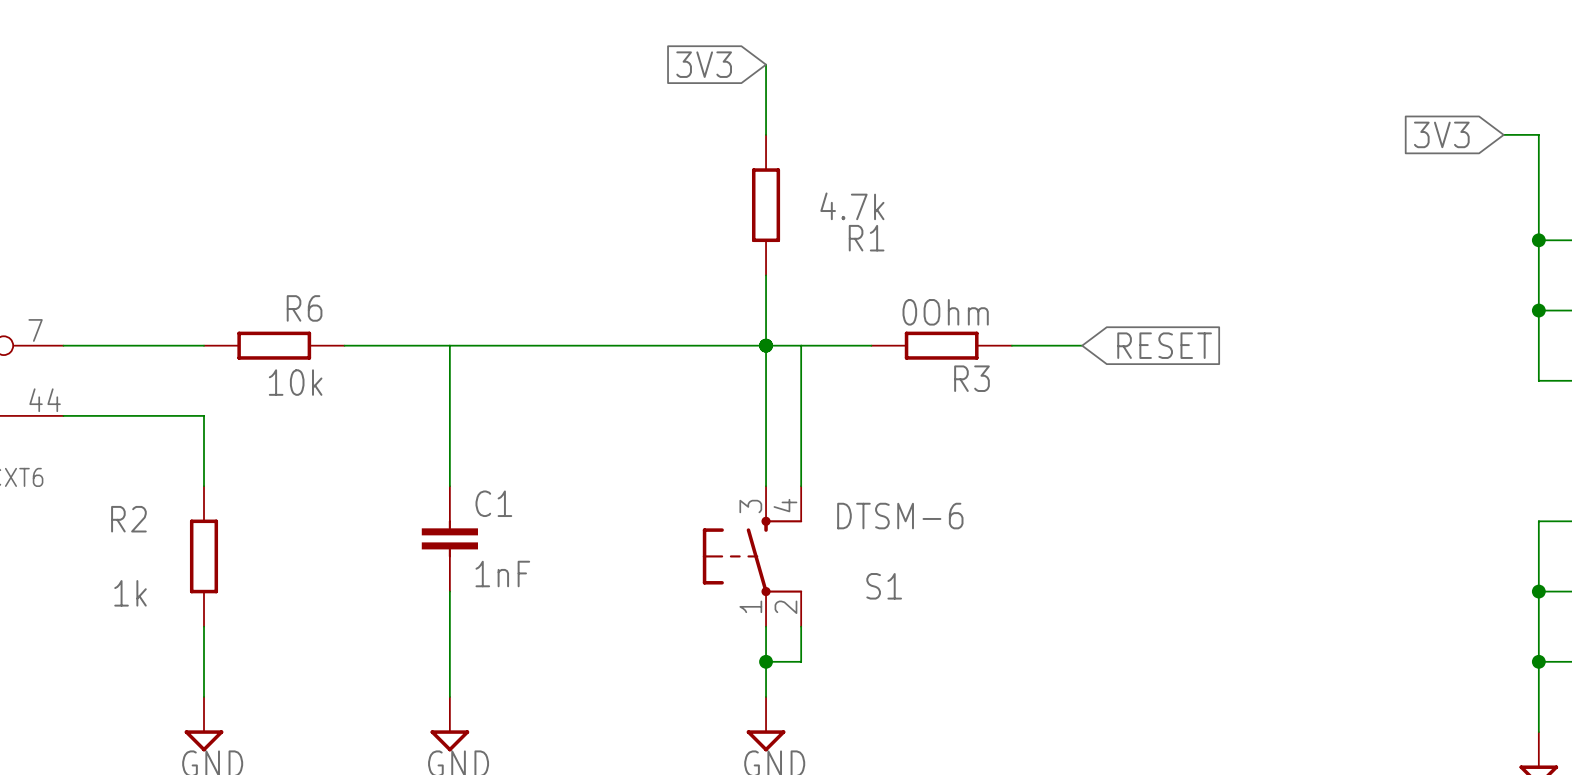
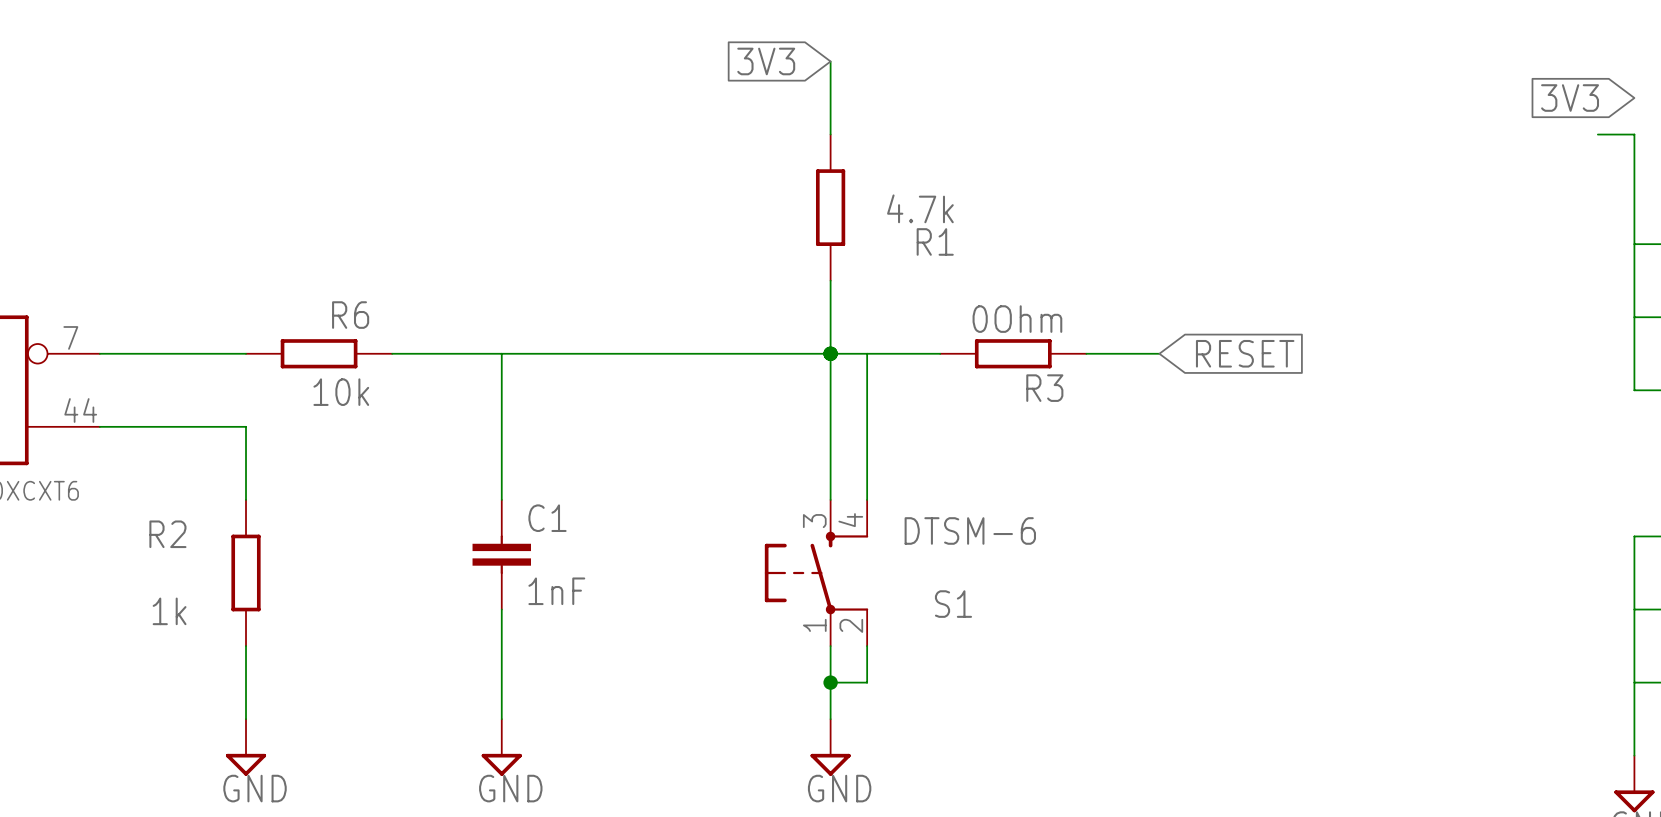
global label position: 3V3 (1441, 134) -> 3V3 (1570, 98)
junction: (1538, 240) -> none
junction: (1538, 310) -> none
junction: (1538, 591) -> none
junction: (1538, 661) -> none

